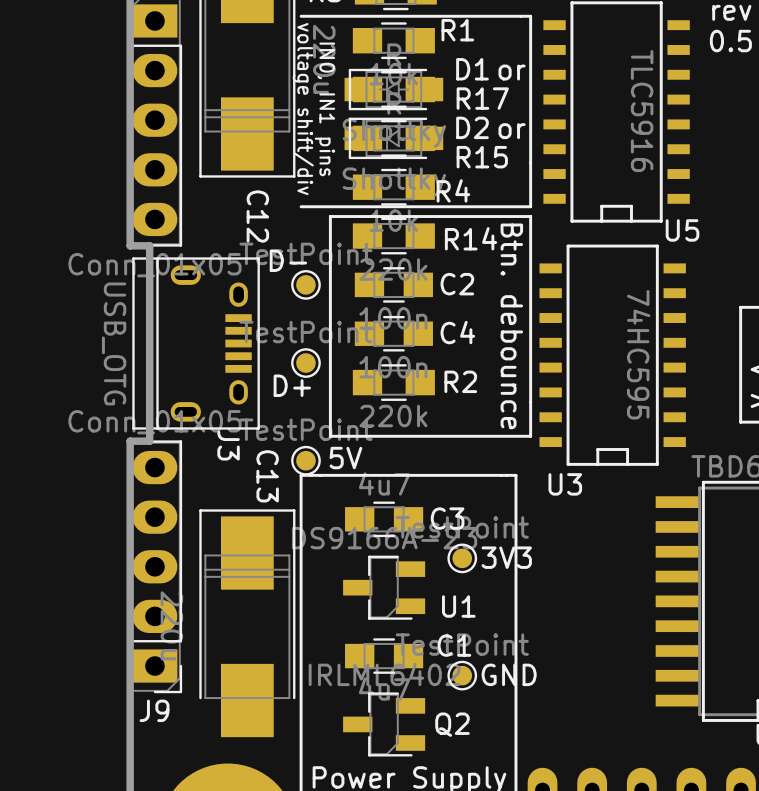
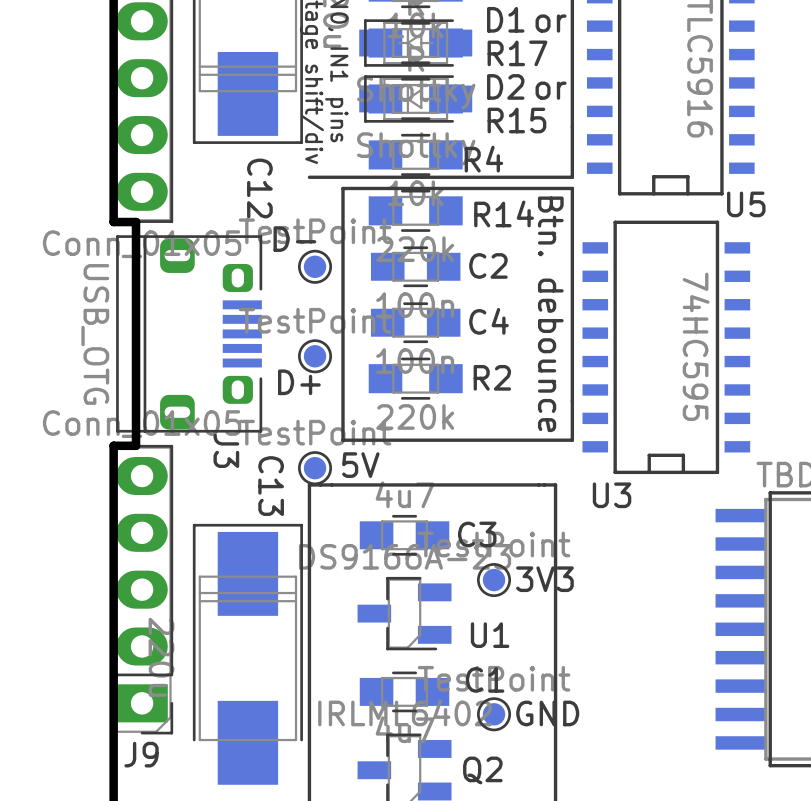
J3 footprint: [132, 257, 260, 430] -> [116, 235, 263, 433]

